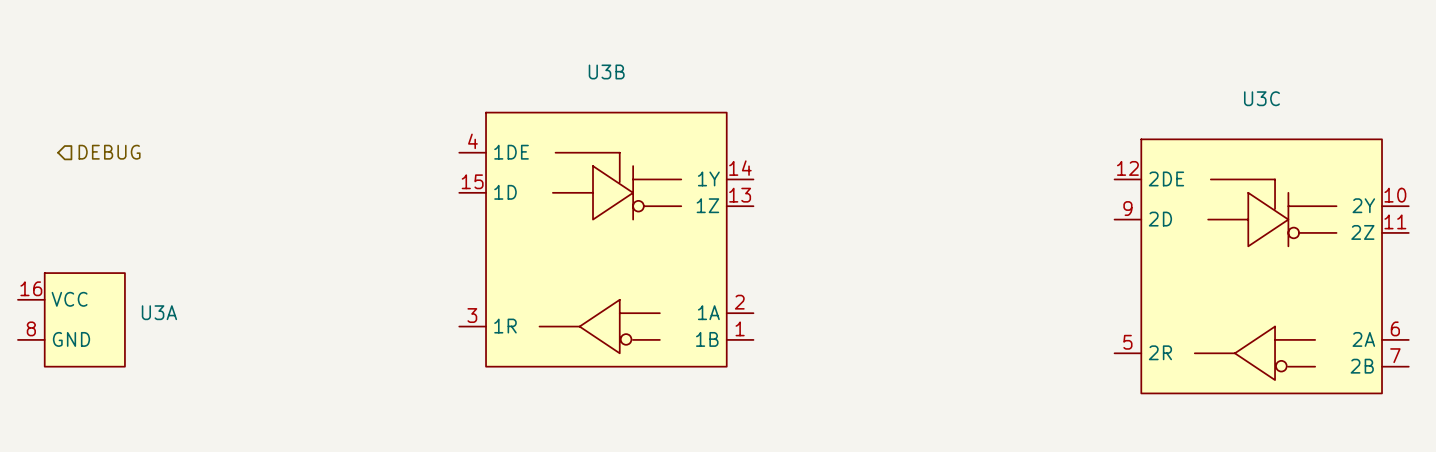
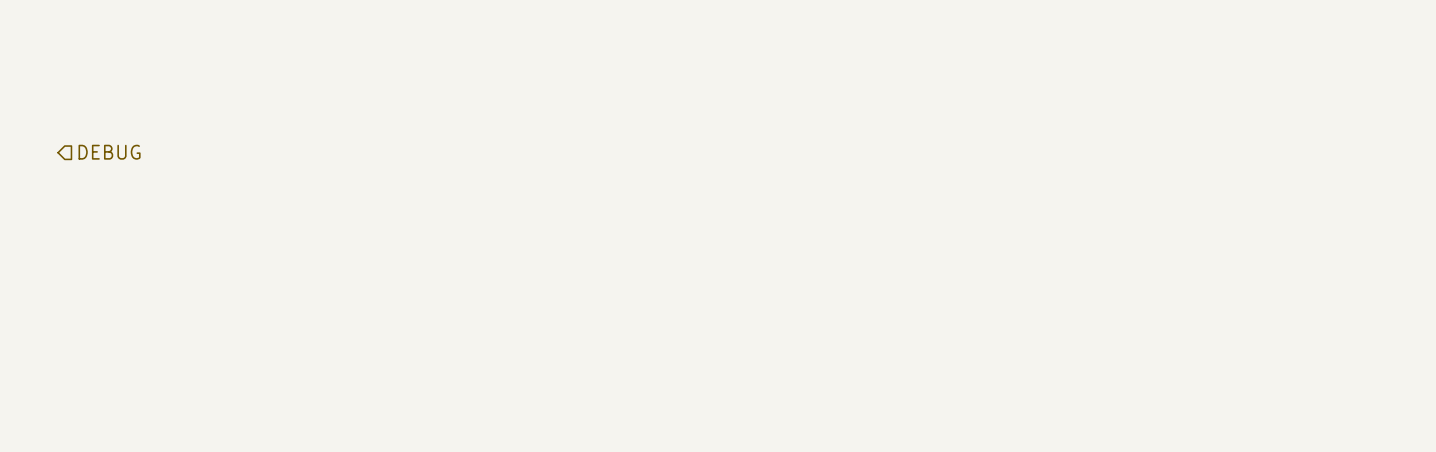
U3B: (606, 239) -> none
U3C: (1261, 266) -> none
U3A: (71, 319) -> none

